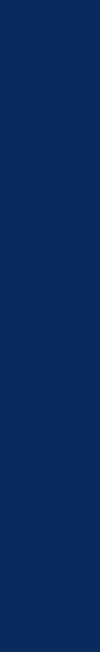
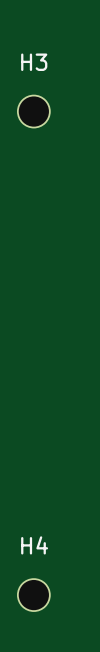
H3: none -> (33, 111)
H4: none -> (33, 595)

